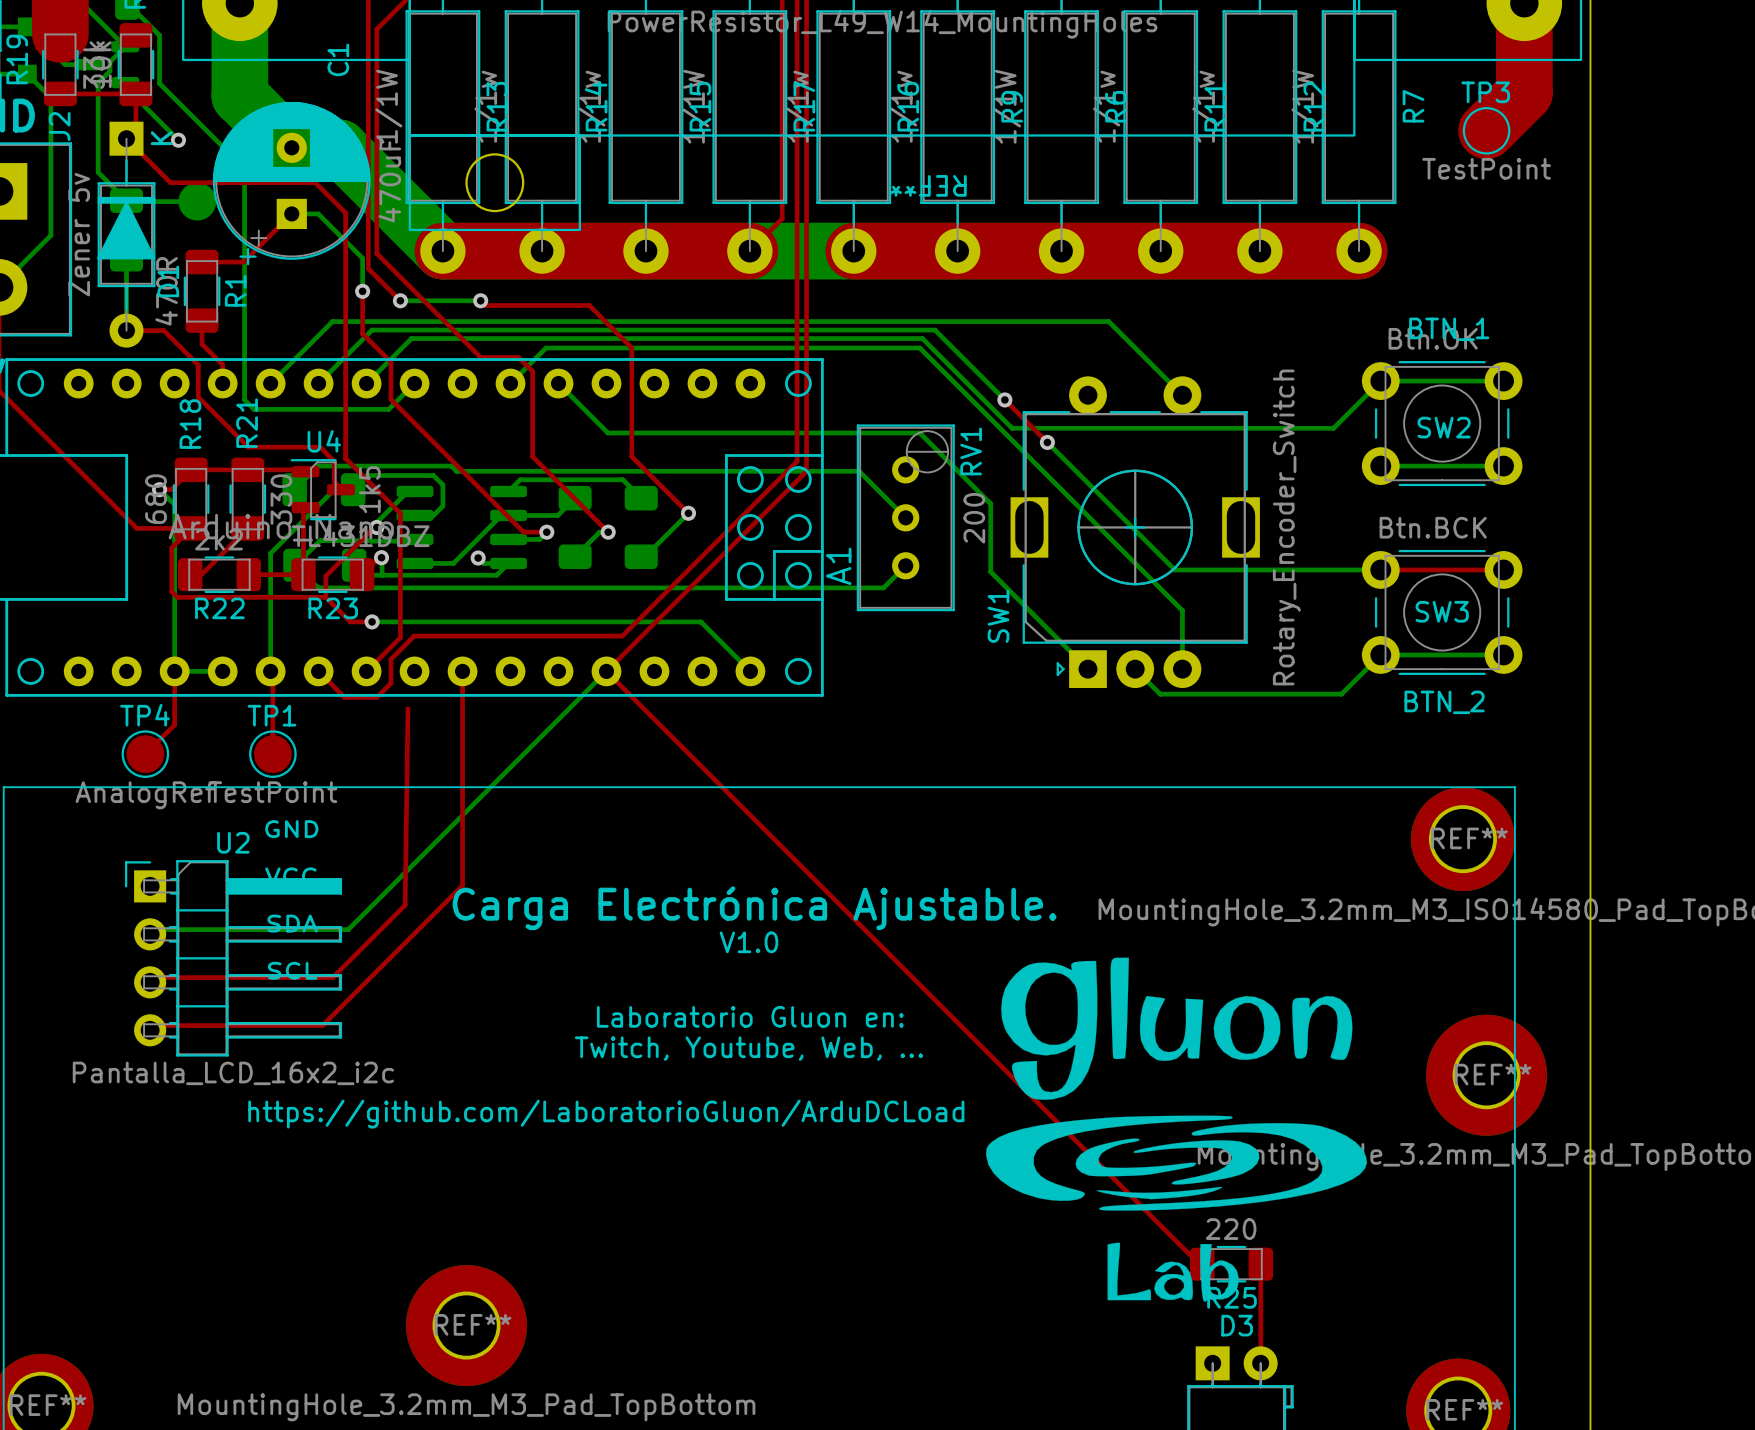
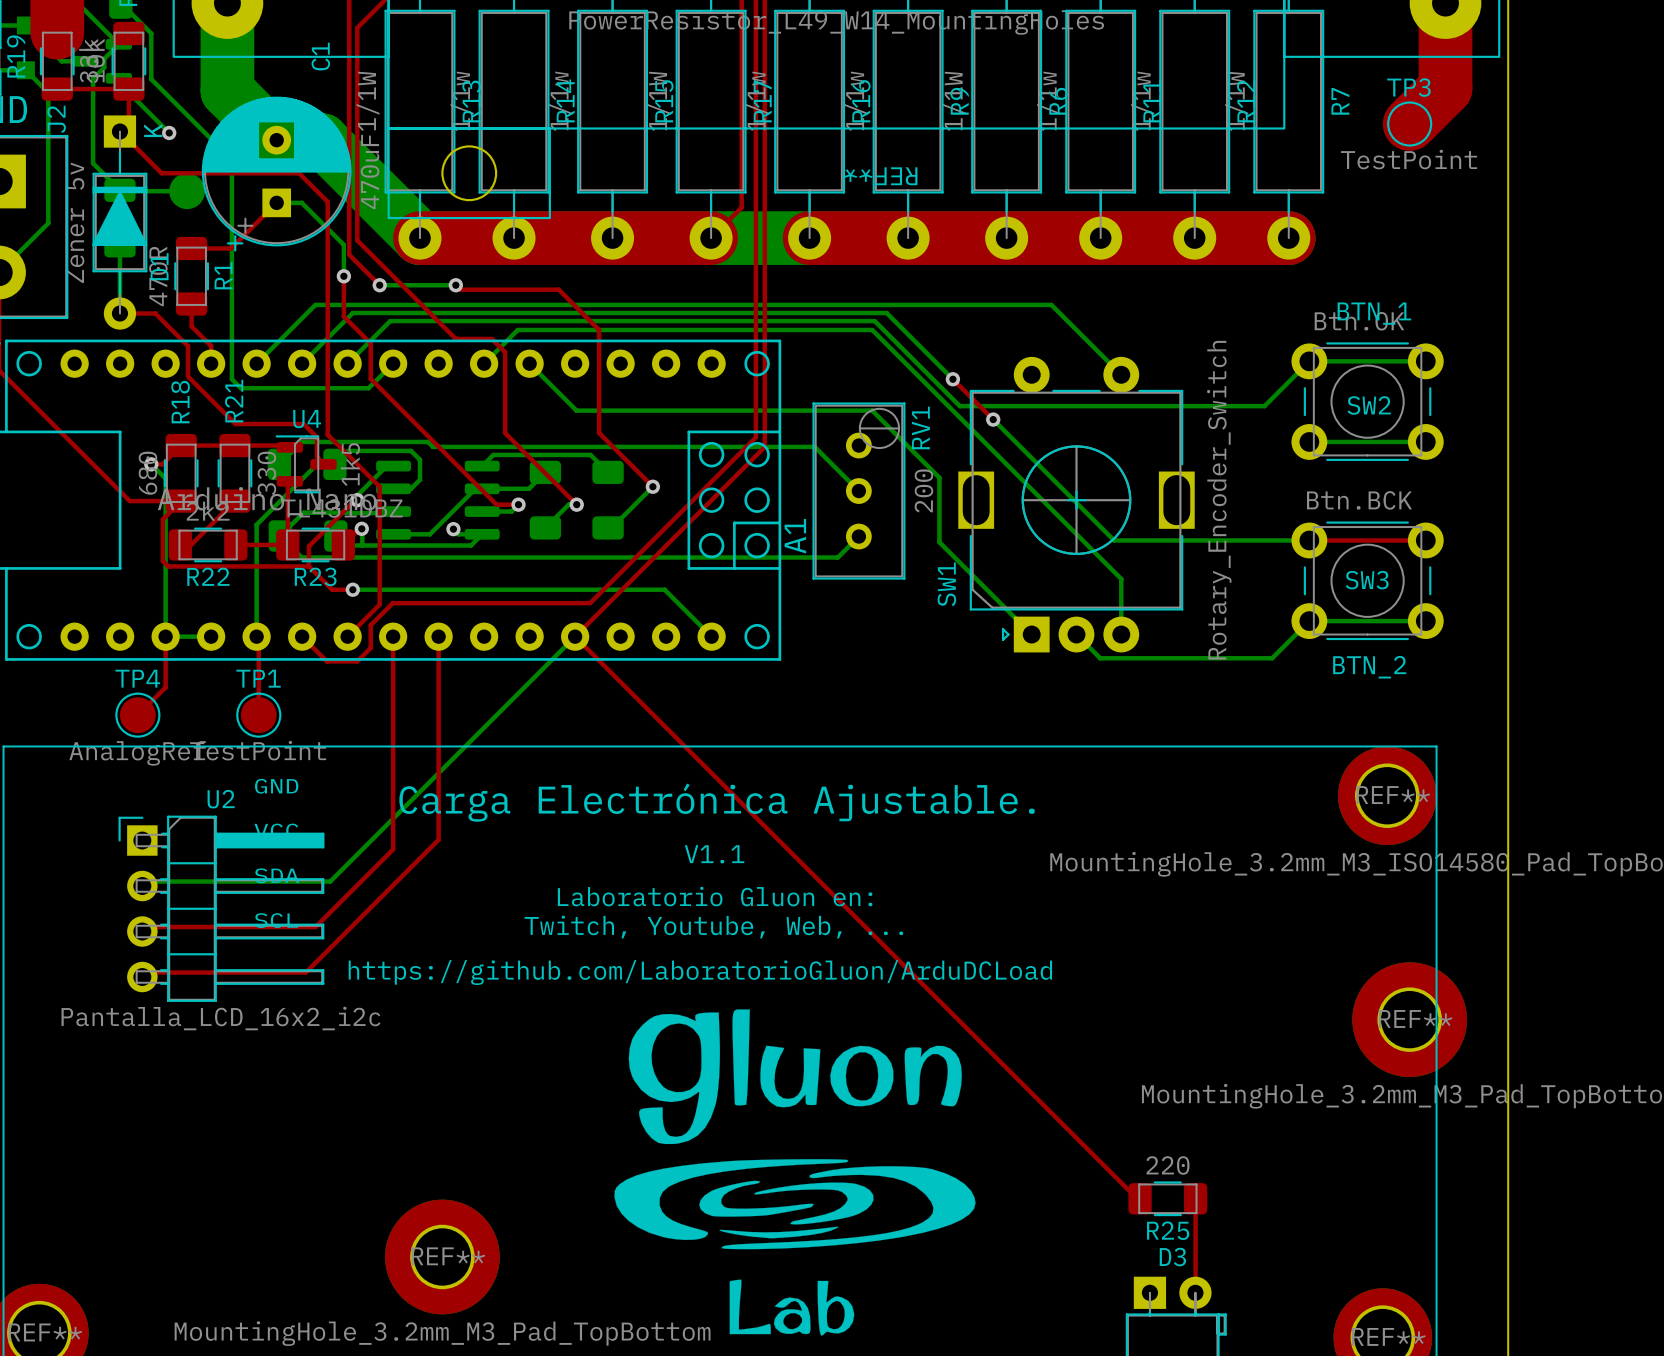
top track: (407, 708) (405, 905) -> (393, 636) (393, 849) (384, 858)
text: none -> Carga Electrónica Ajustable. (717, 802)
text: Carga Electrónica Ajustable. (754, 908) -> V1.1 (714, 854)
text: V1.0 (748, 942) -> Laboratorio Gluon en: (715, 896)
text: Laboratorio Gluon en: (750, 1016) -> none
text position: Twitch, Youtube, Web, ... (748, 1048) -> Twitch, Youtube, Web, ... (713, 927)
text position: https://github.com/LaboratorioGluon/ArduDCLoad (606, 1114) -> https://github.com/LaboratorioGluon/ArduDCLoad (700, 972)
drawing position: (1176, 1129) -> (795, 1172)

